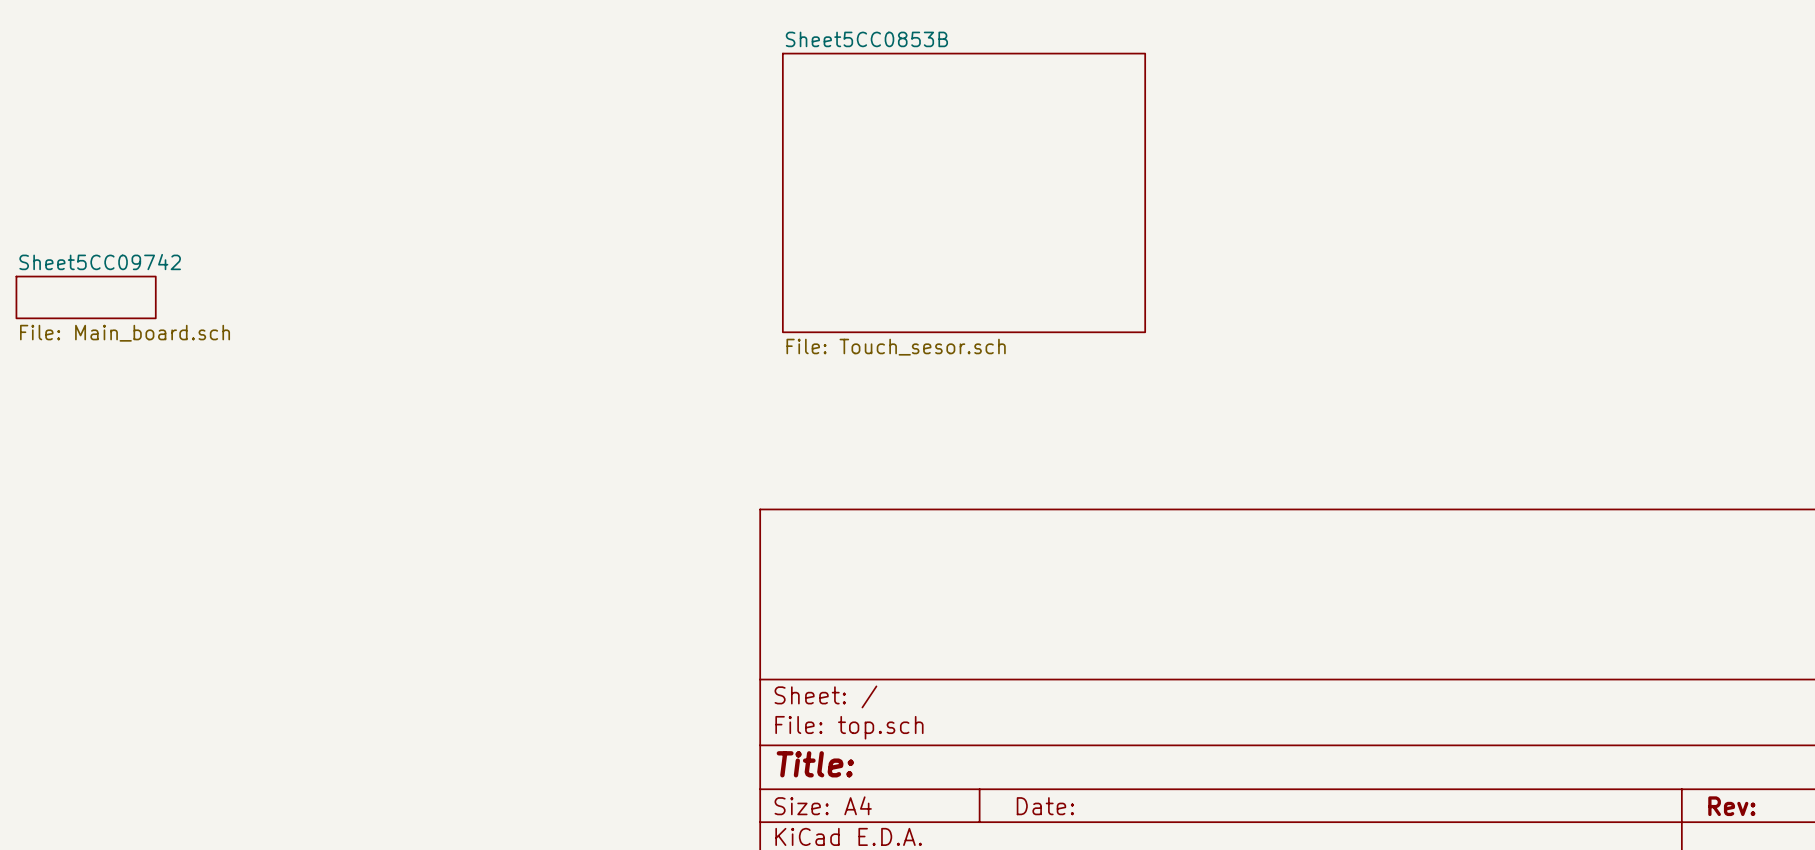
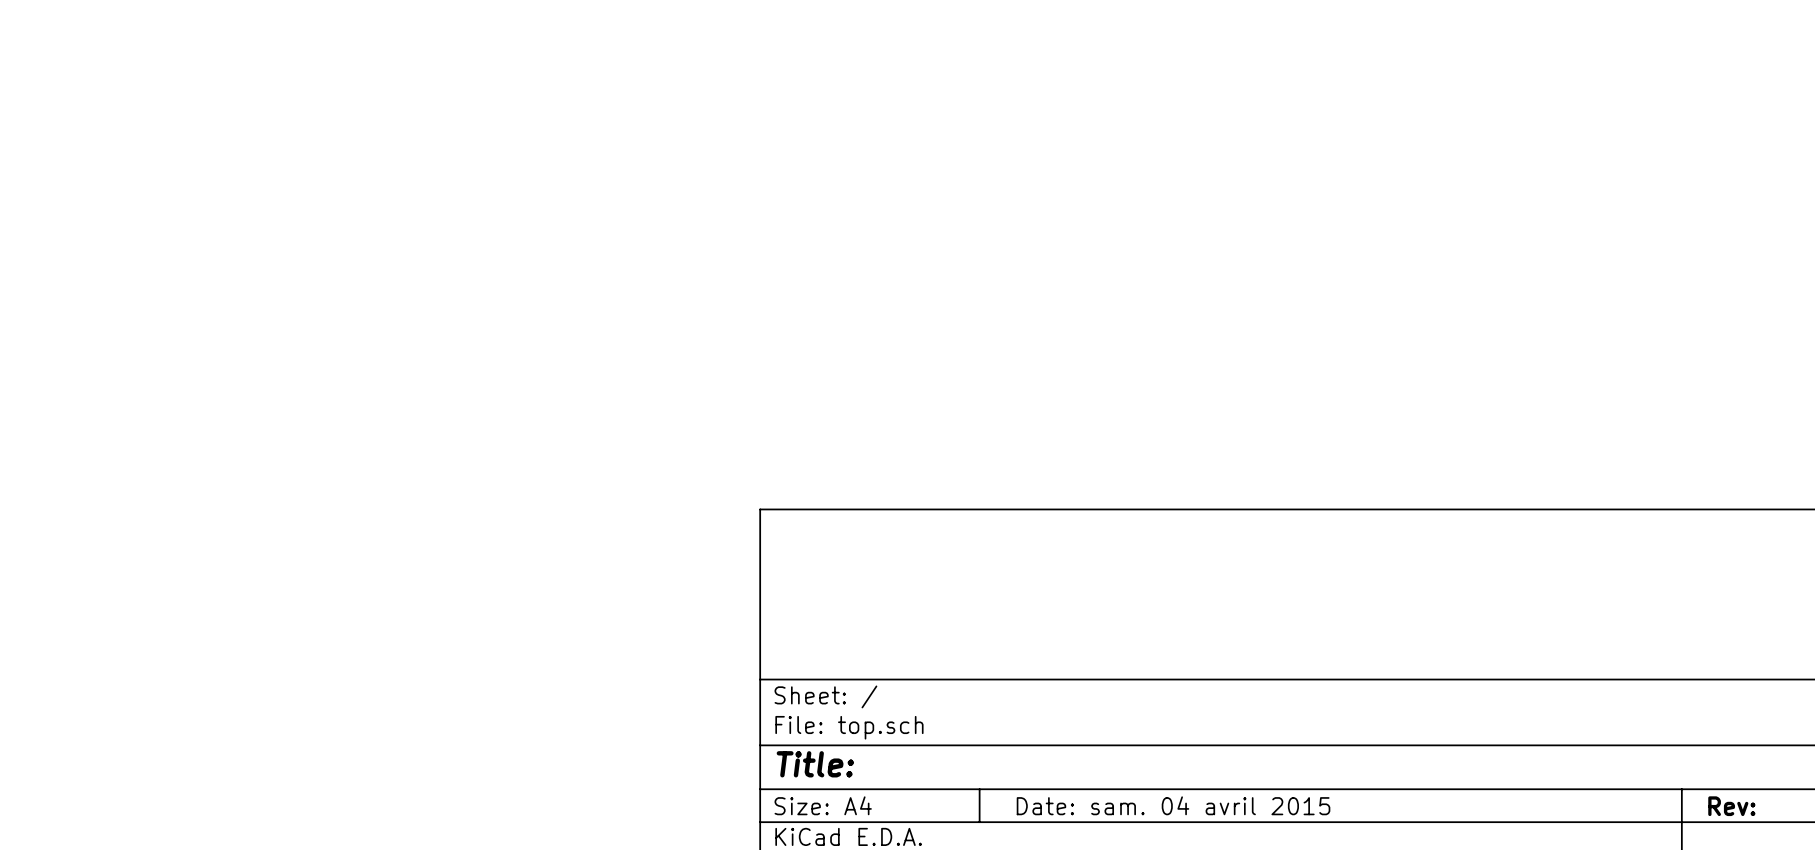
sheet Sheet5CC0853B: File: Touch_sesor.sch (964, 192) -> none
sheet Sheet5CC09742: File: Main_board.sch (86, 297) -> none
title block: Date: (1045, 806) -> Date: sam. 04 avril 2015 (1173, 805)

